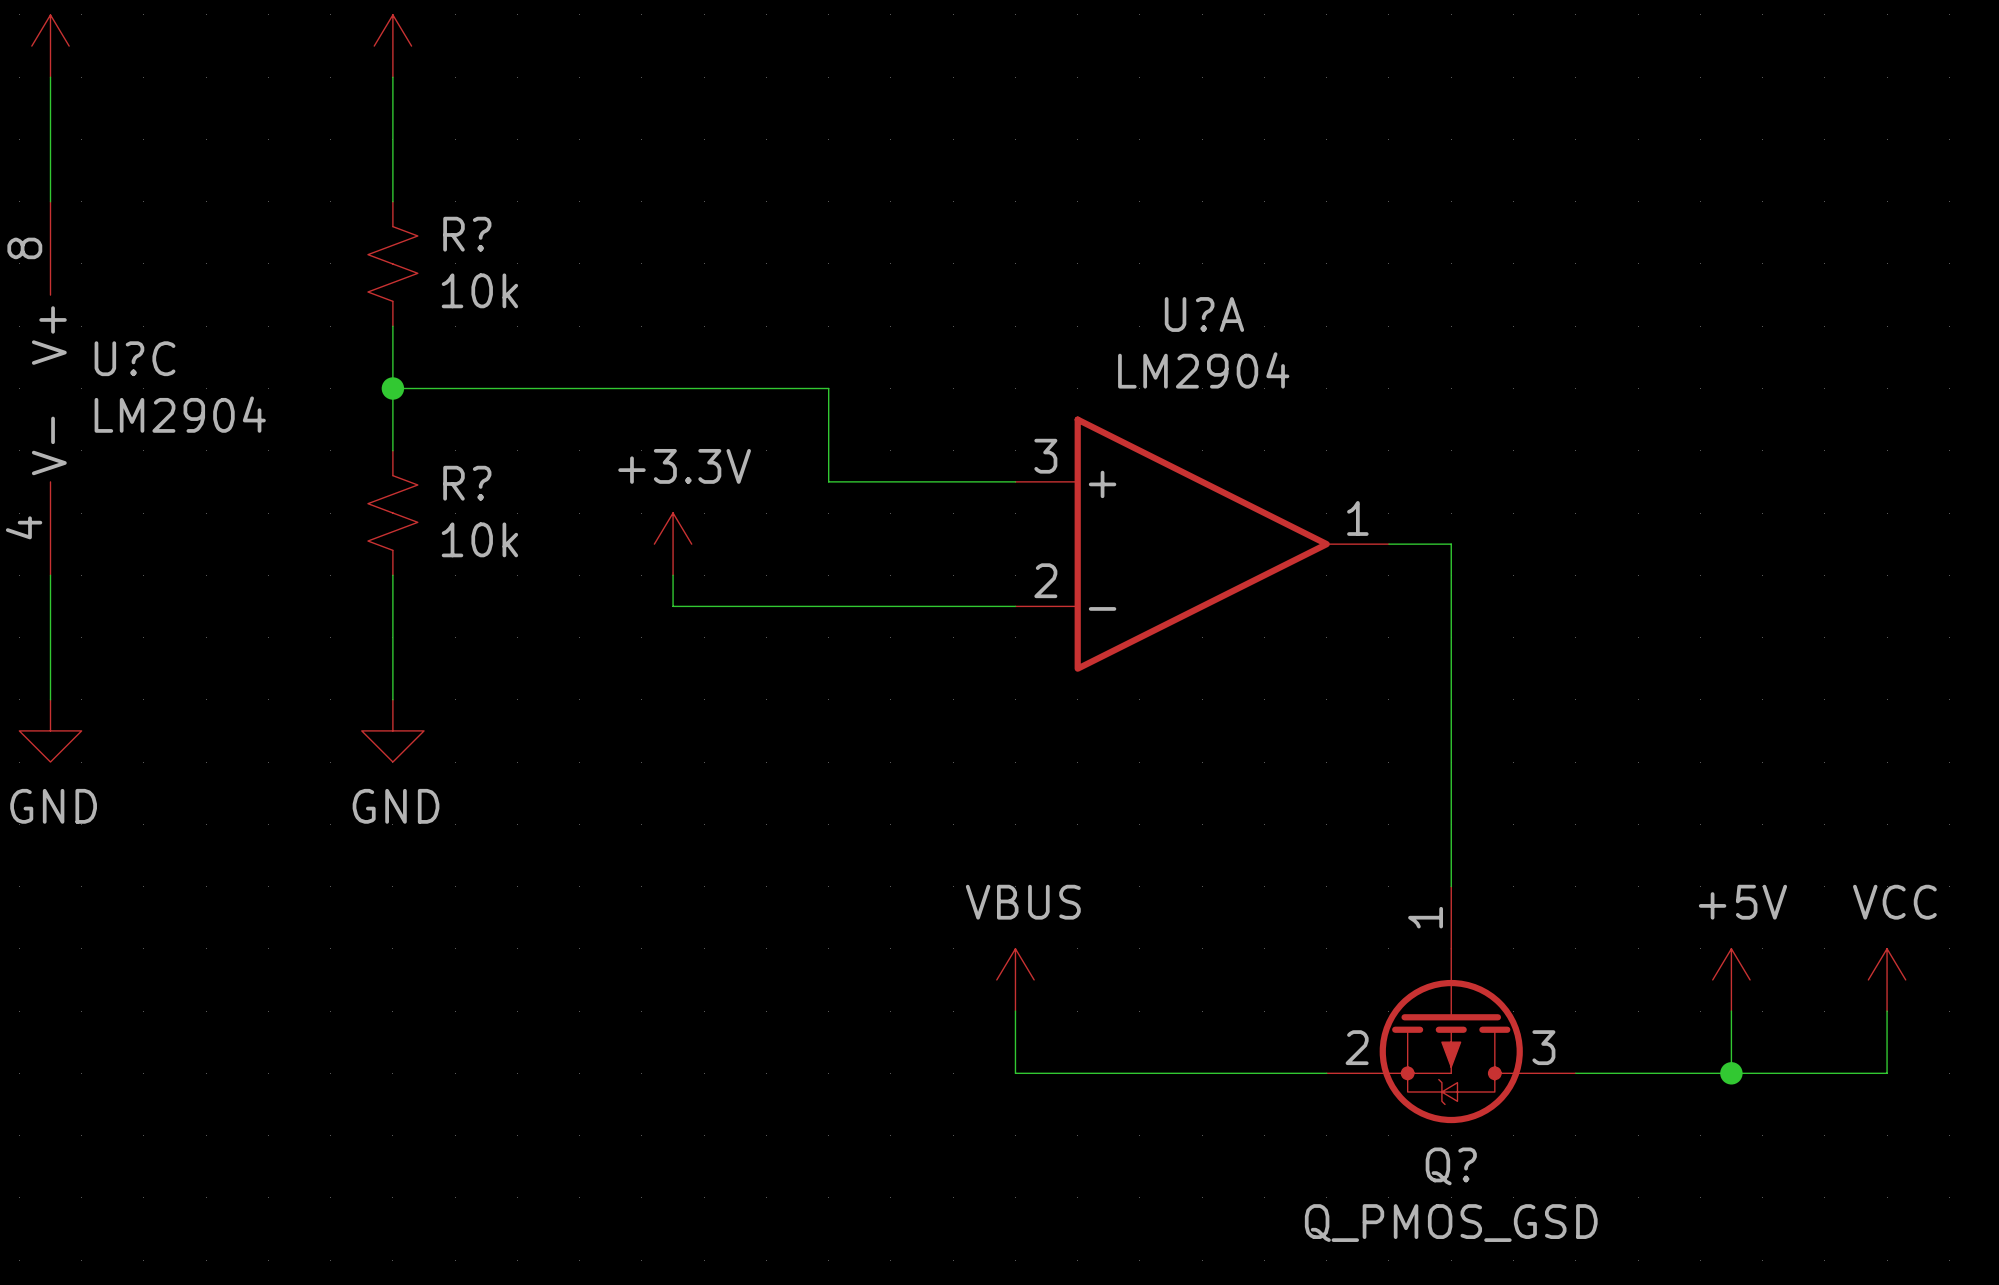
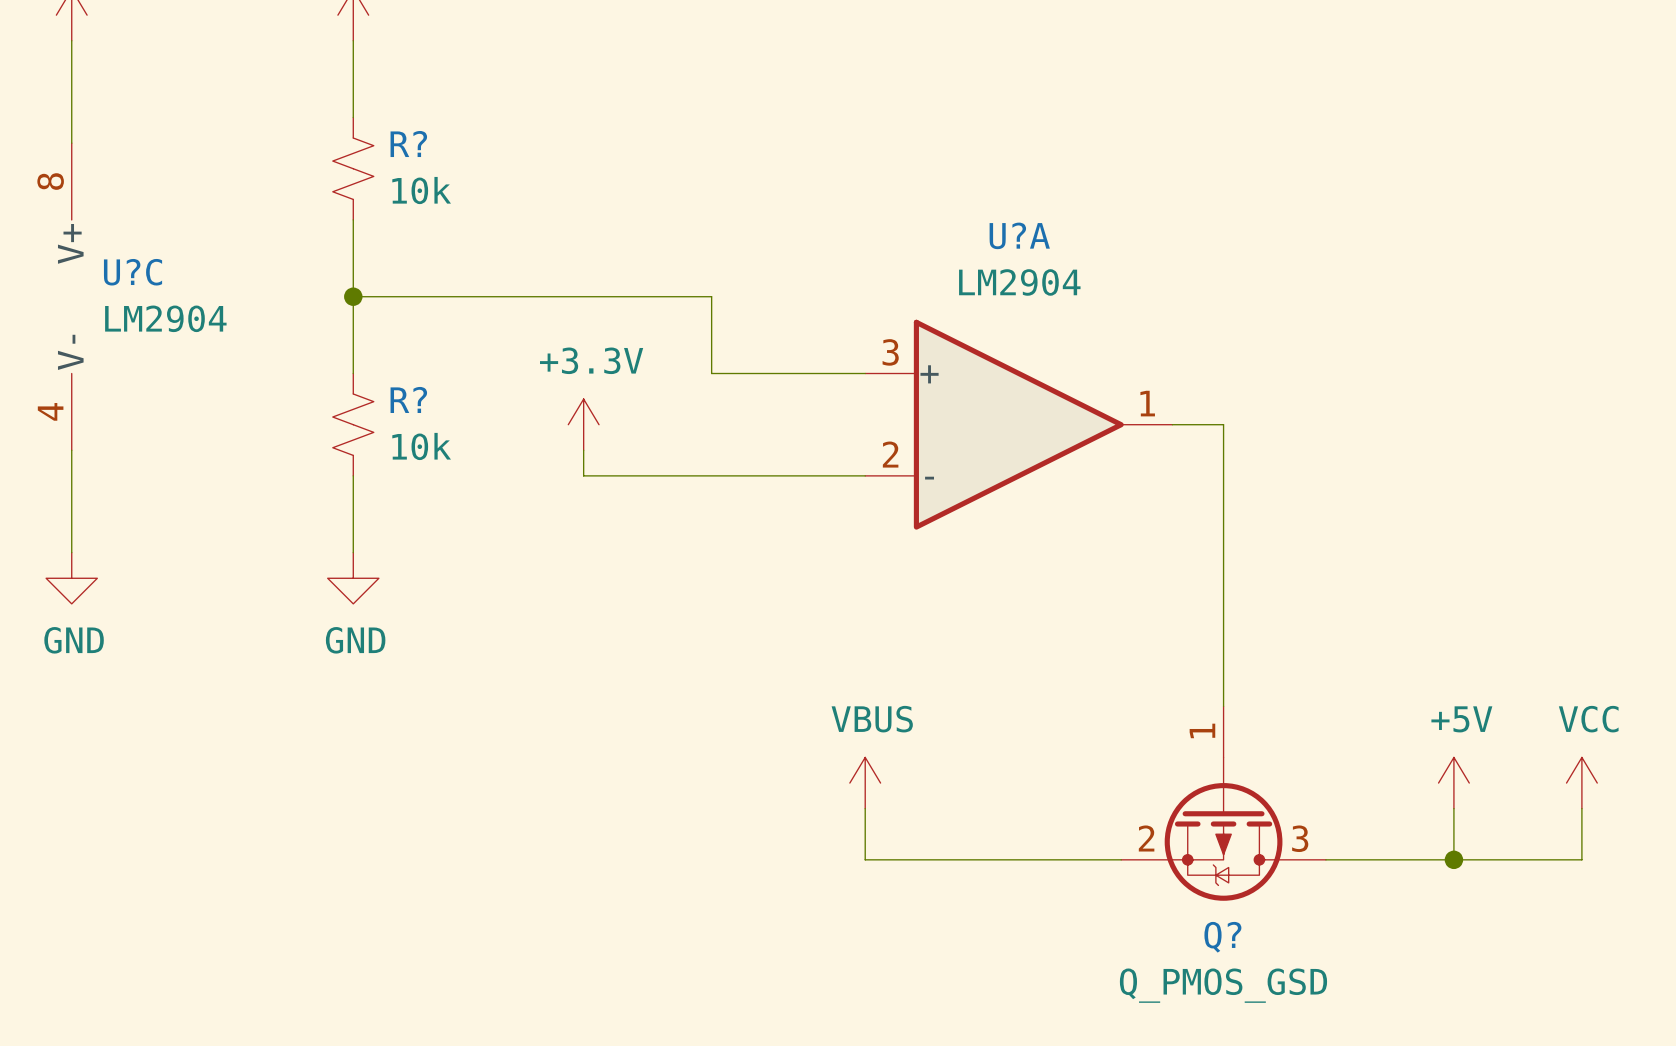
R? position: (392, 263) -> (353, 168)
R? position: (392, 513) -> (353, 424)

